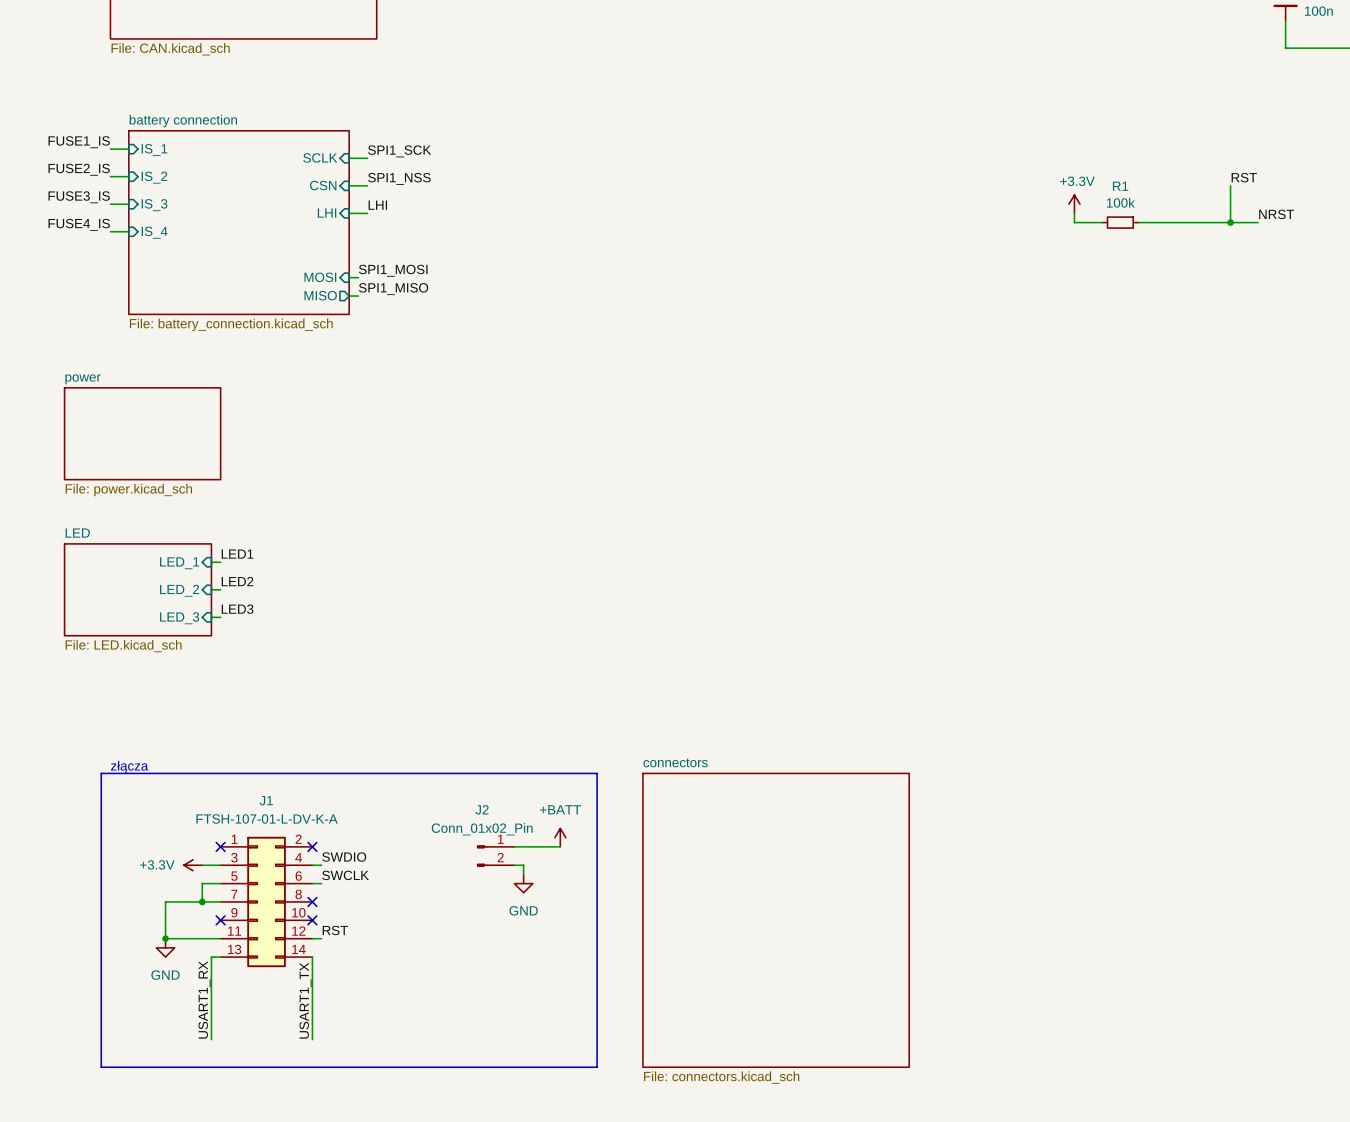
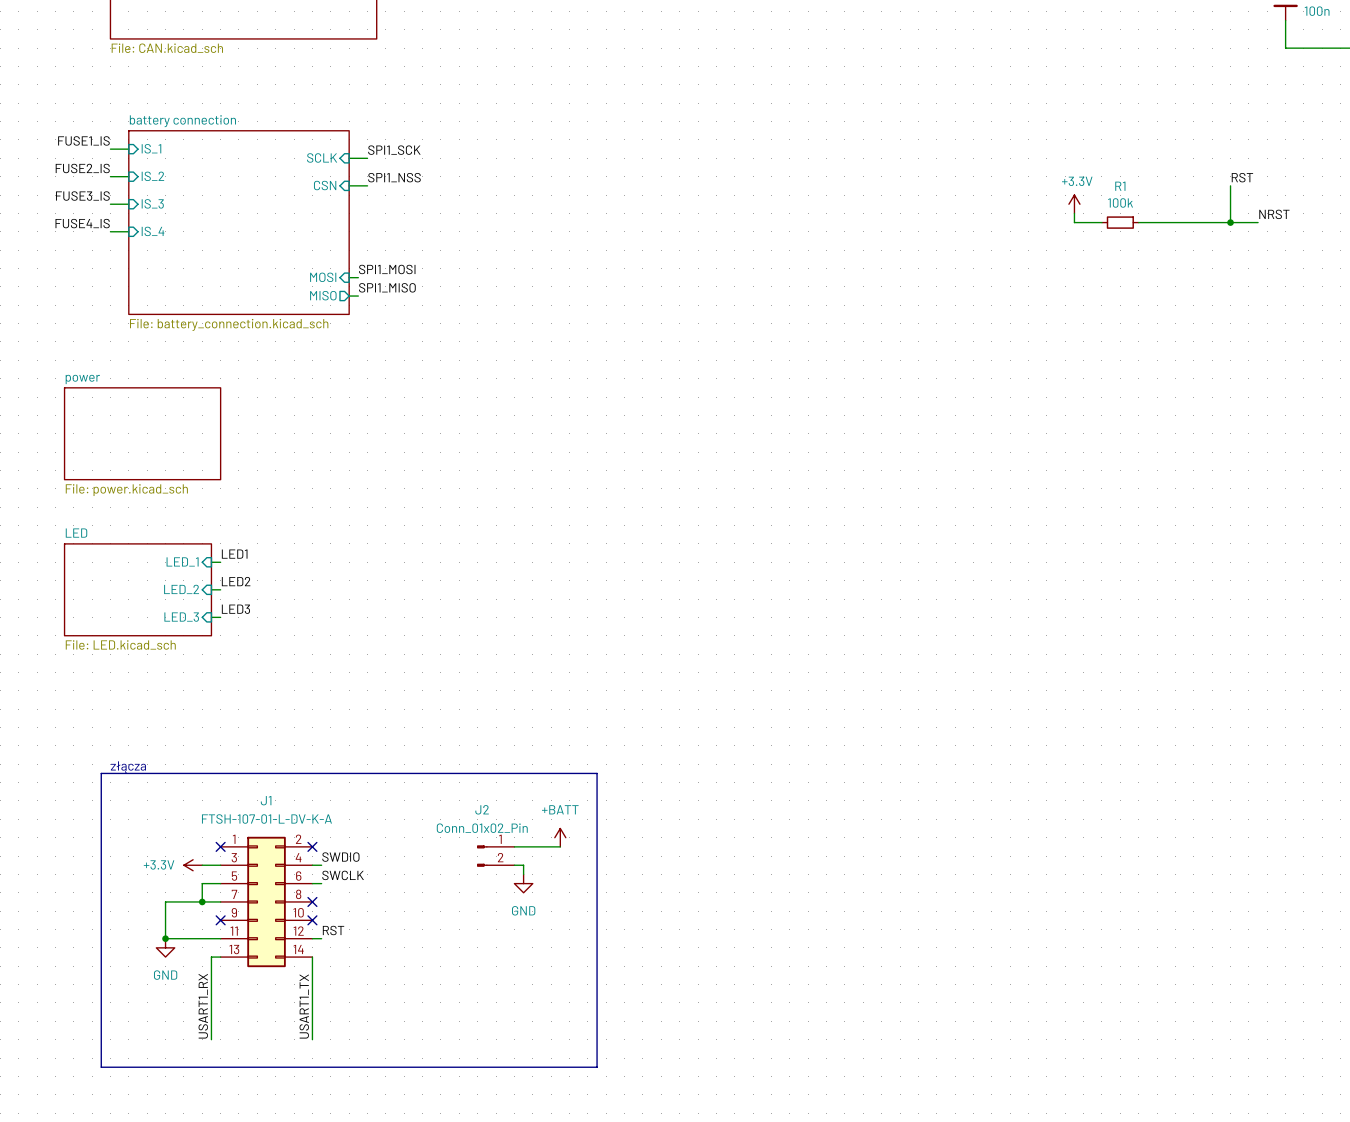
label: LHI (377, 205) -> none
sheet pin: LHI (327, 213) -> none
wire: (349, 213) (367, 213) -> none
sheet connectors: File: connectors.kicad_sch (776, 920) -> none

